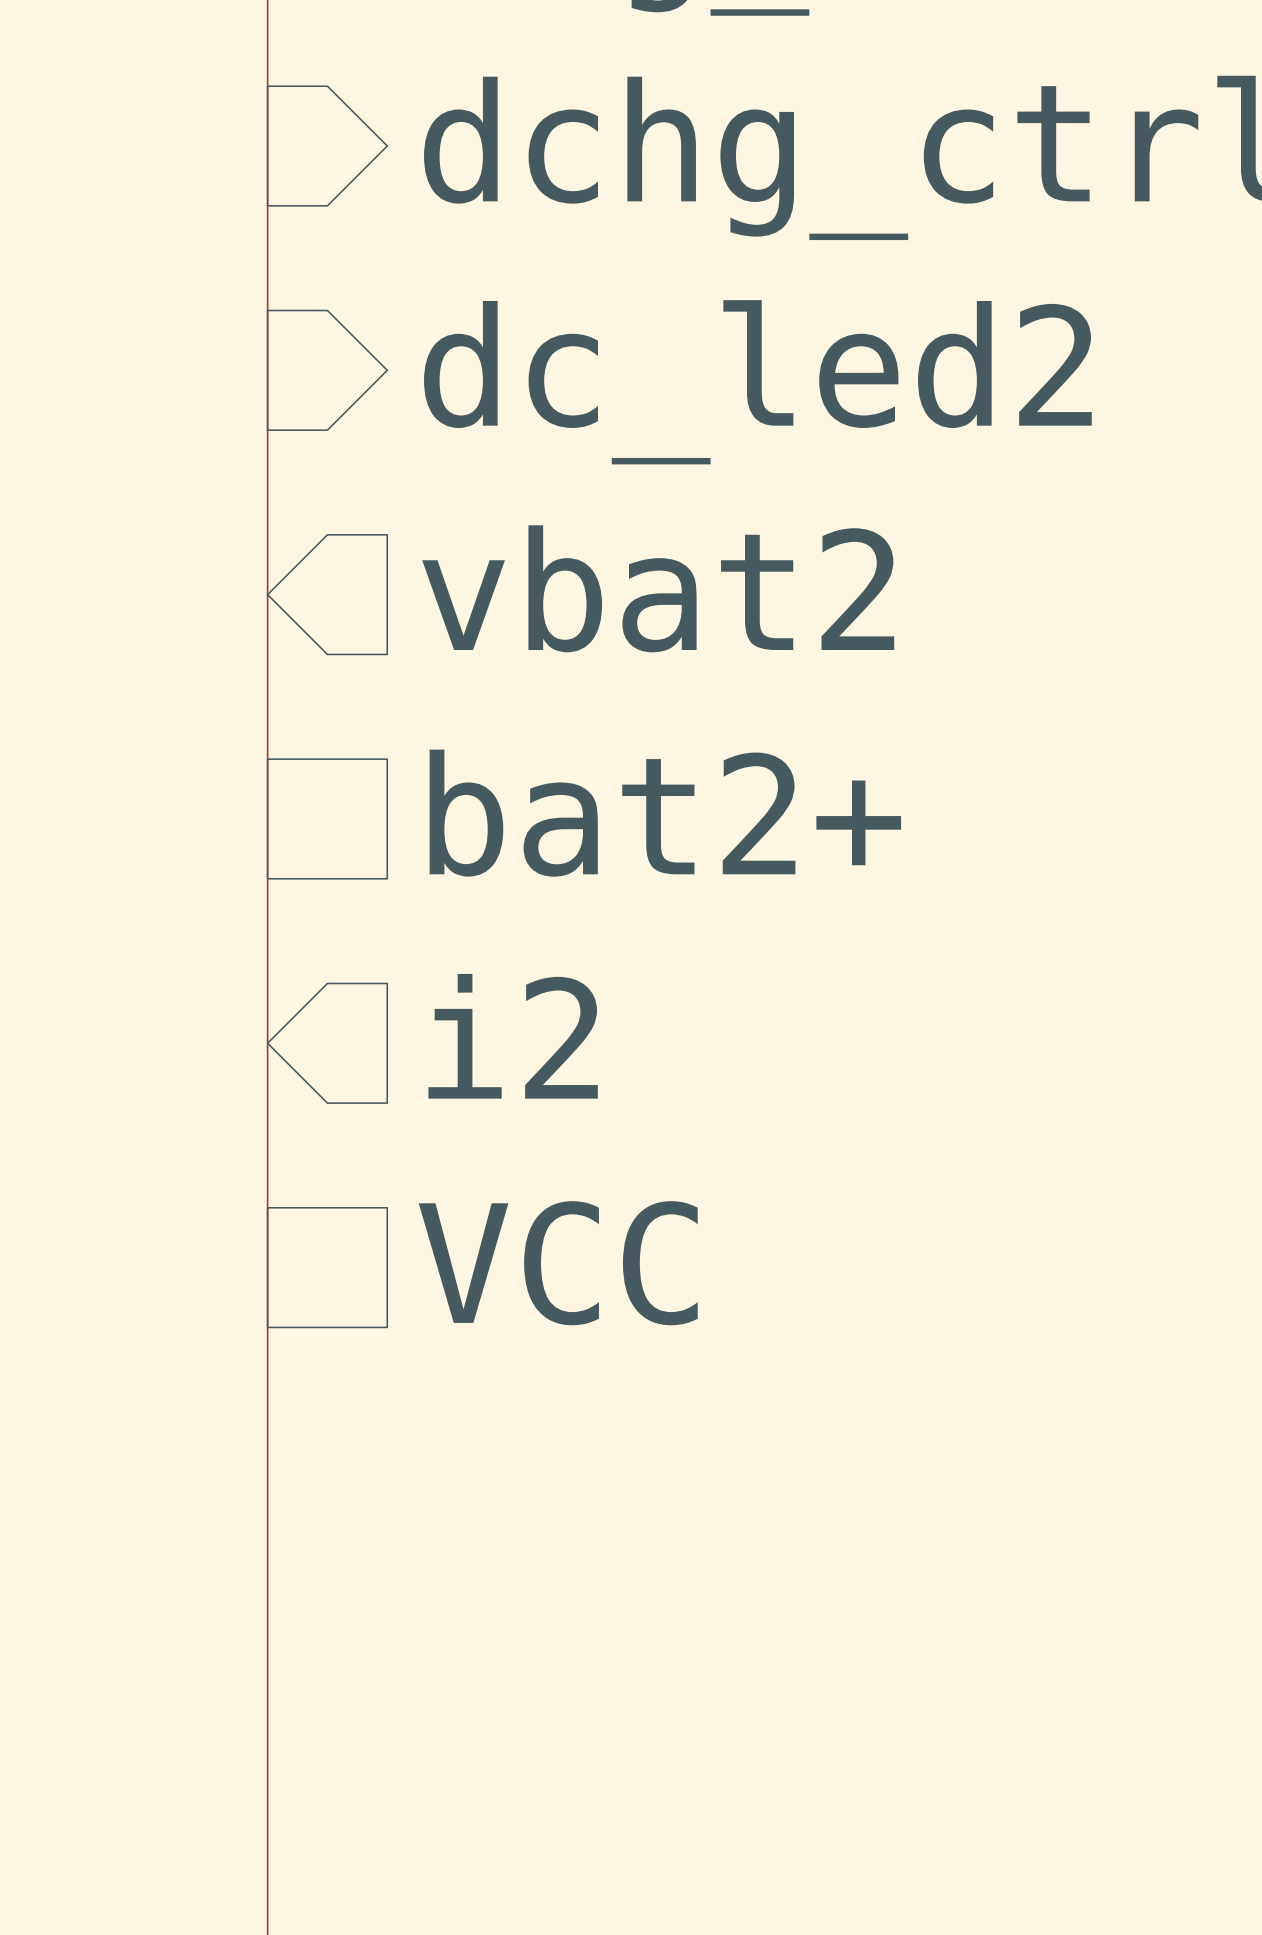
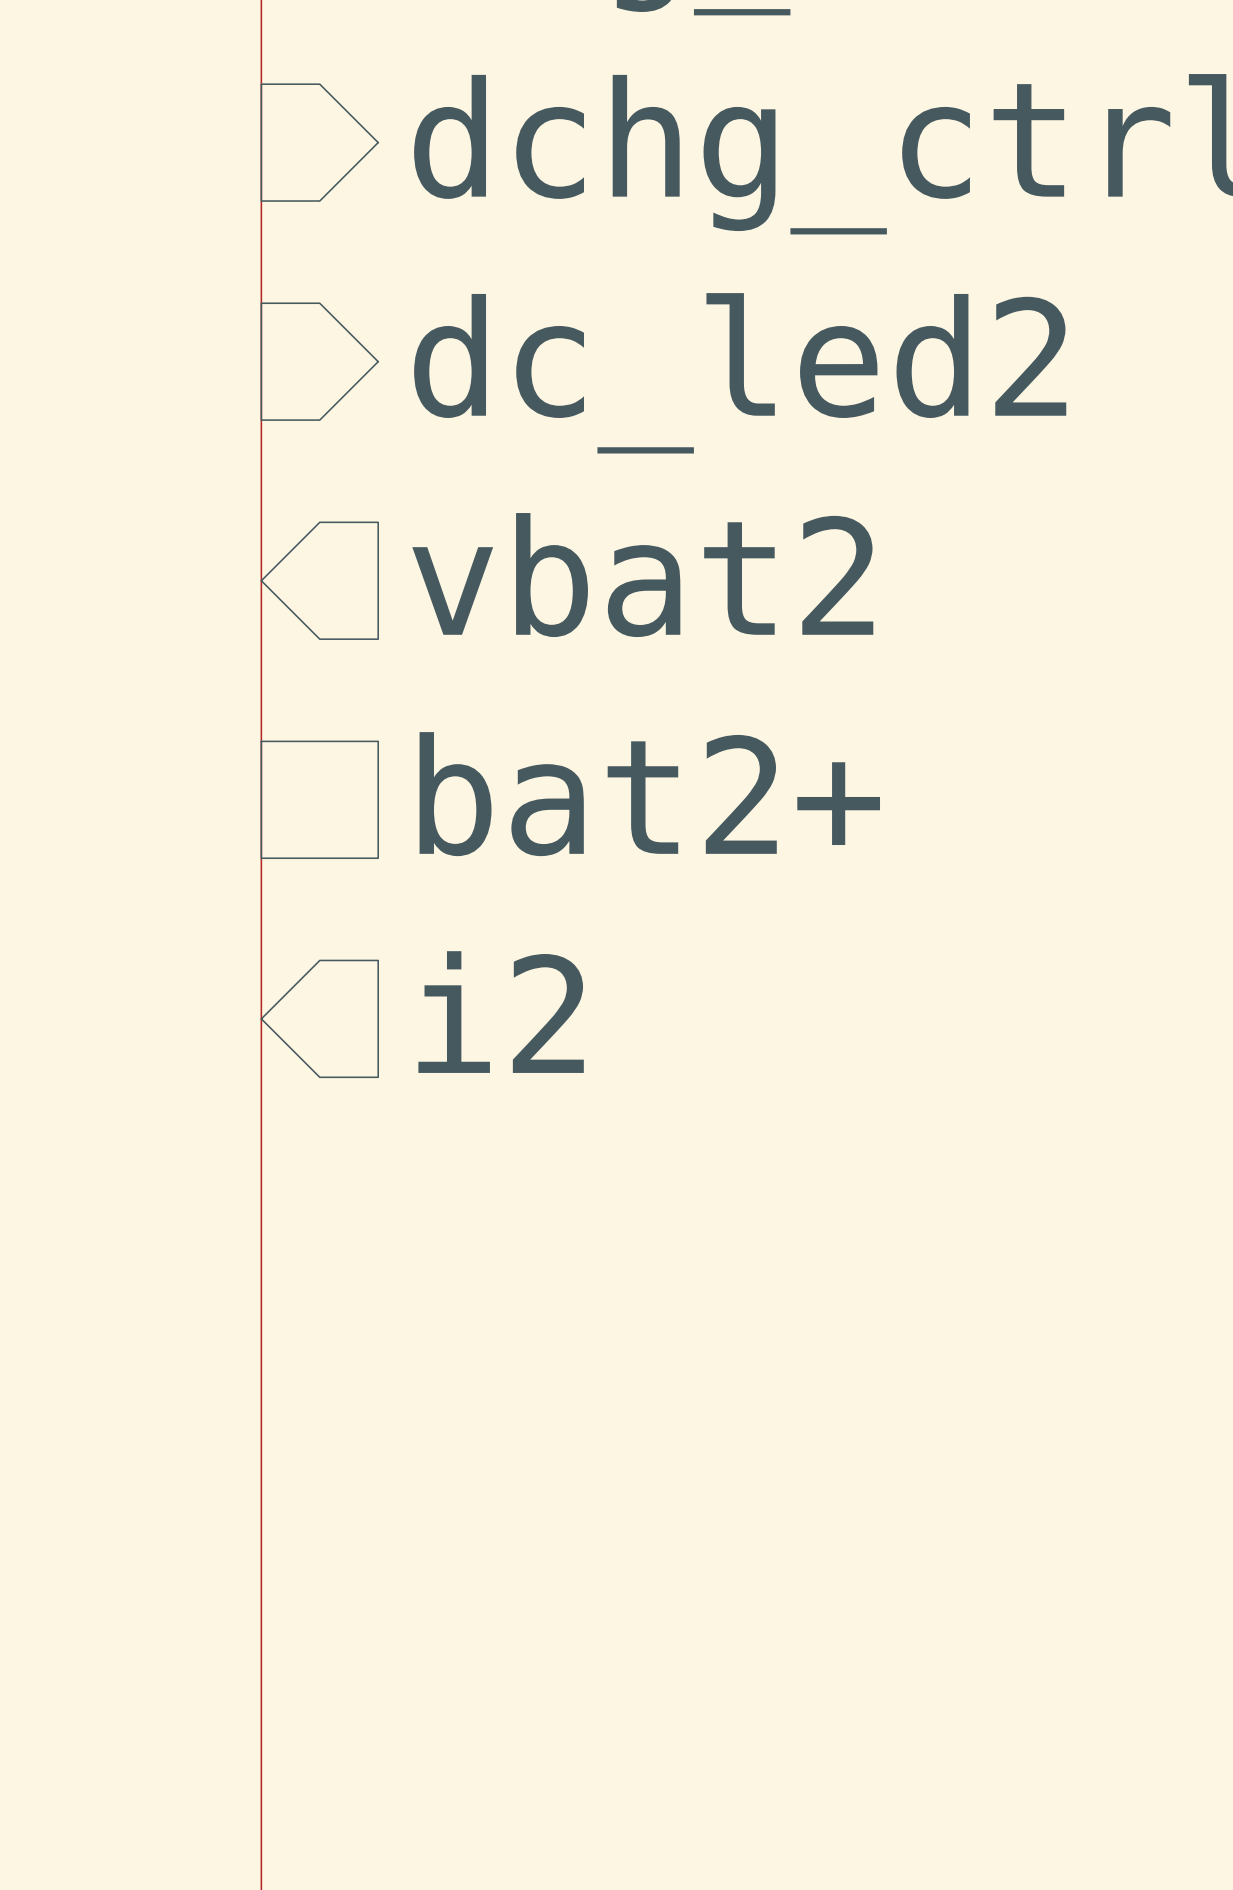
sheet pin: VCC (558, 1263) -> none

